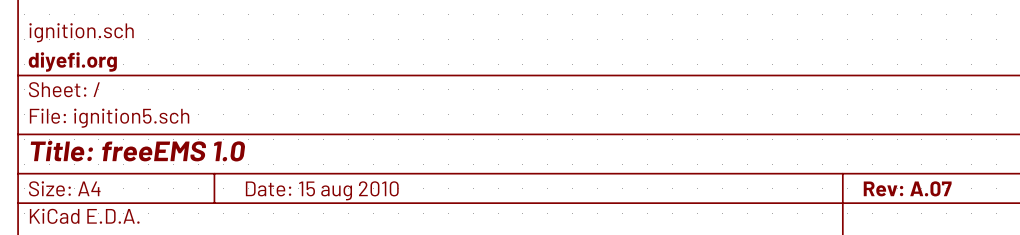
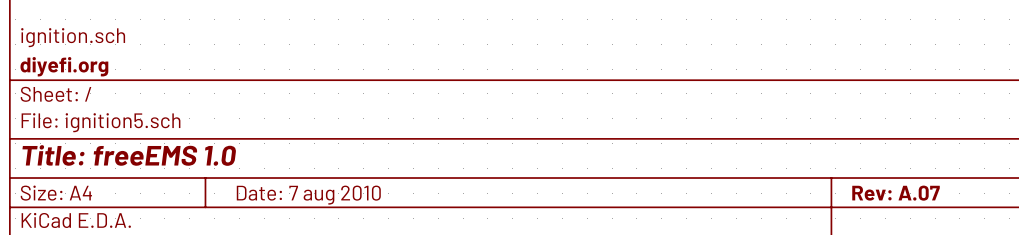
title block: Date: 15 aug 2010 (322, 190) -> Date: 7 aug 2010 (308, 195)

